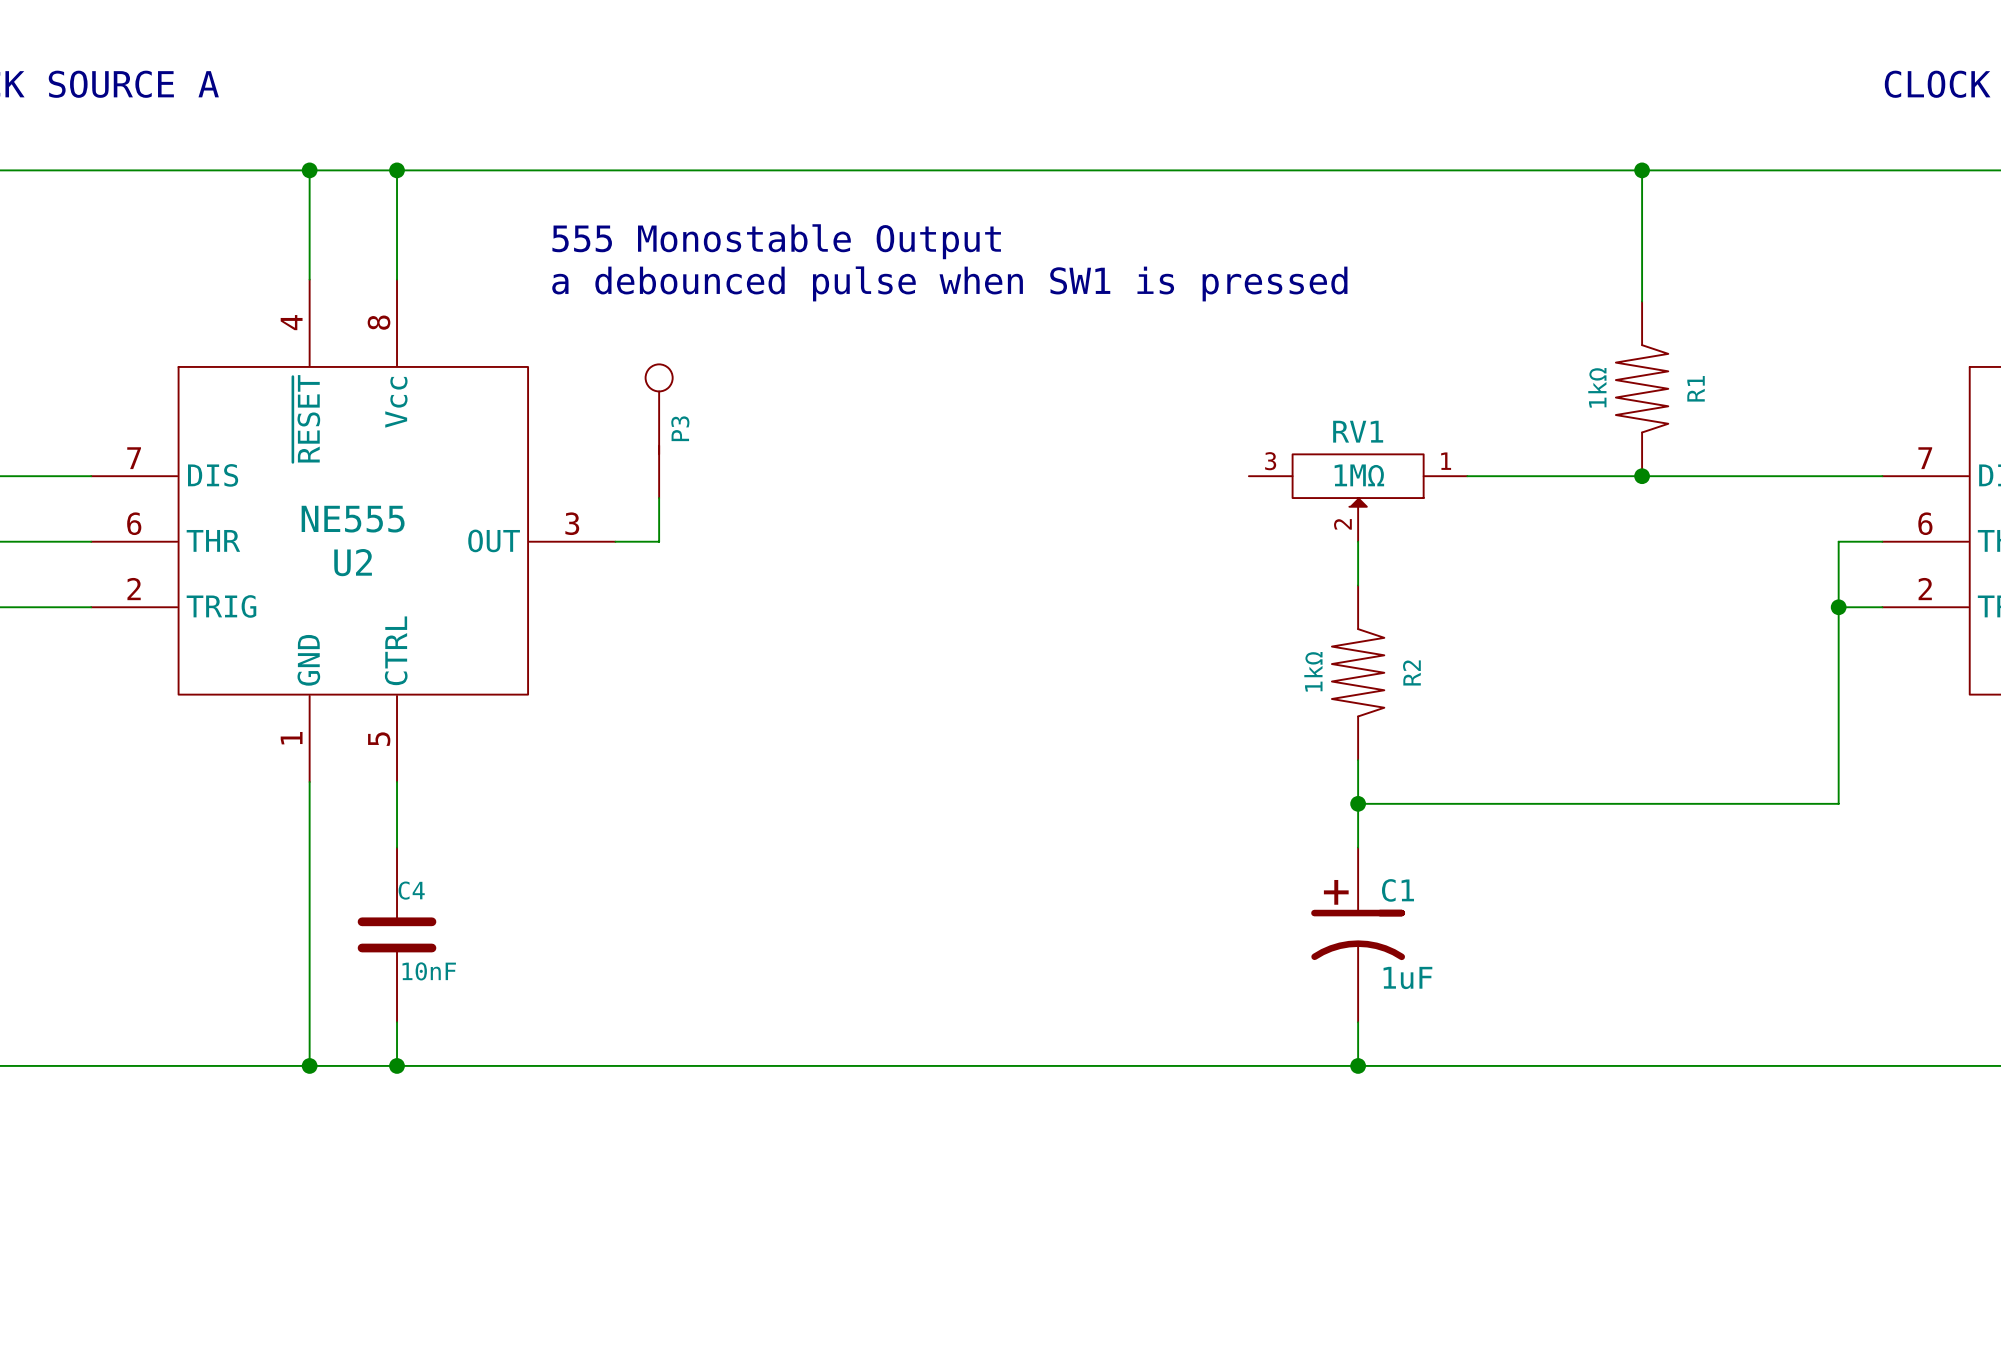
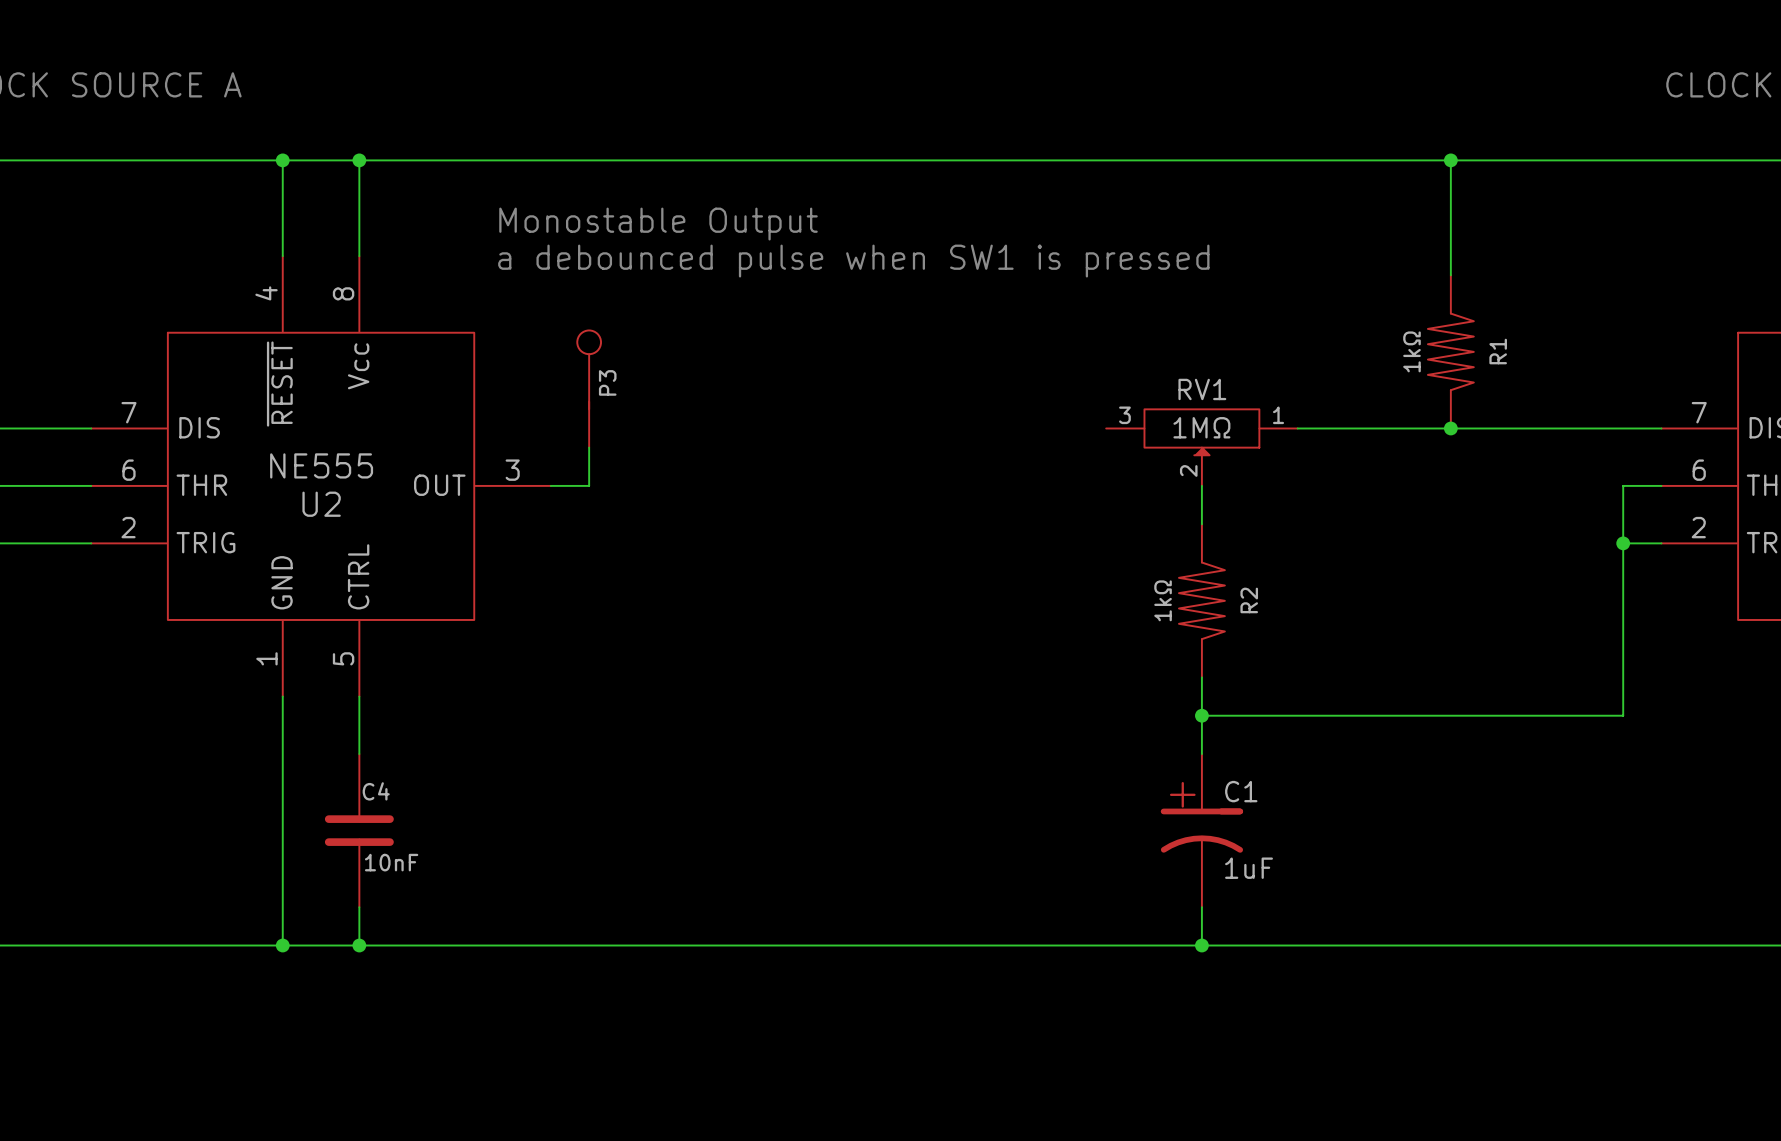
text: 555 Monostable Output (776, 241) -> Monostable Output (658, 224)

